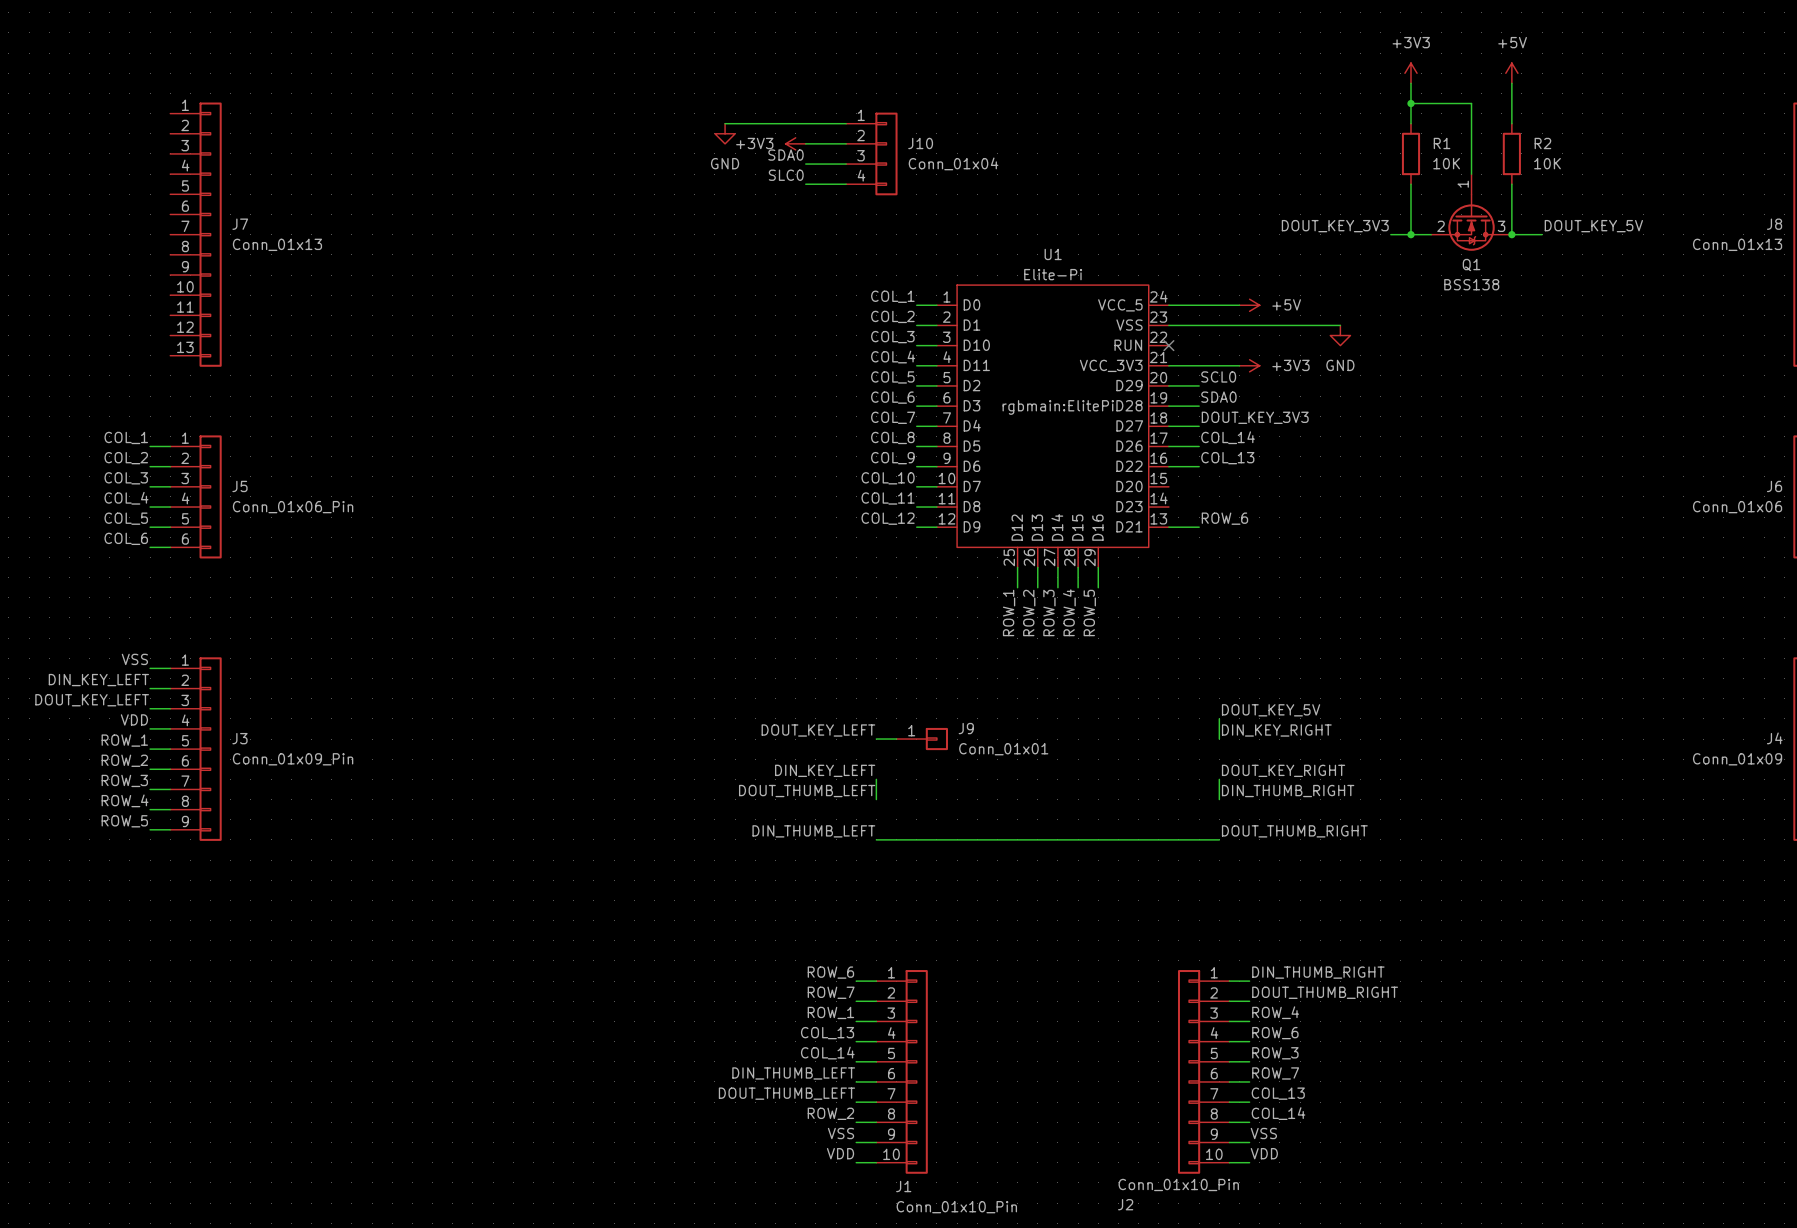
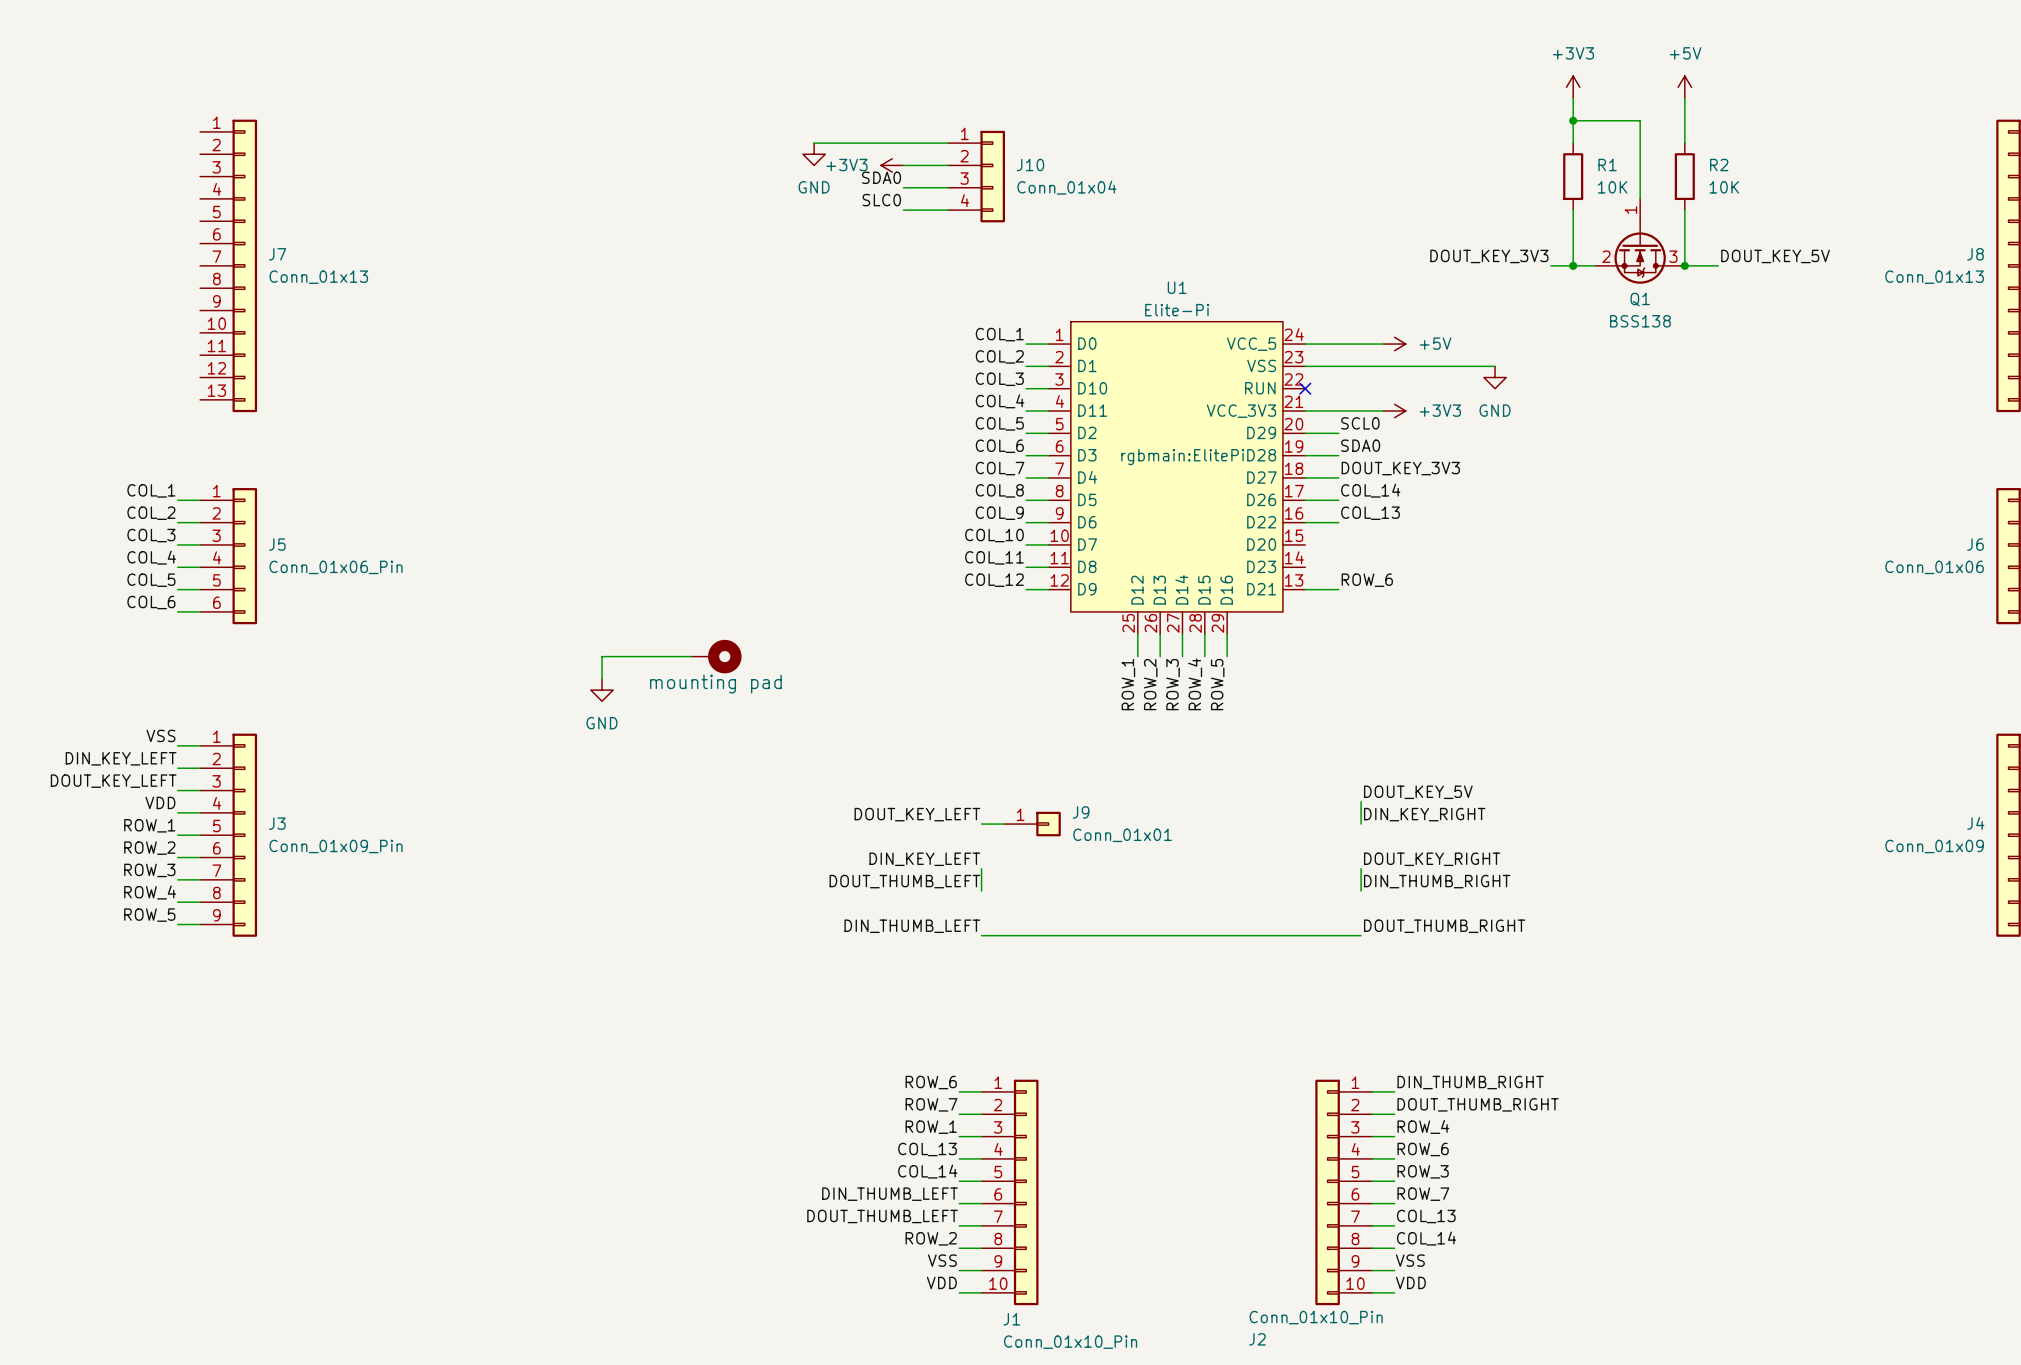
wire: none -> (691, 656) (602, 656) (602, 678)
part: none -> mounting pad (716, 656)
power symbol: none -> GND (602, 690)

